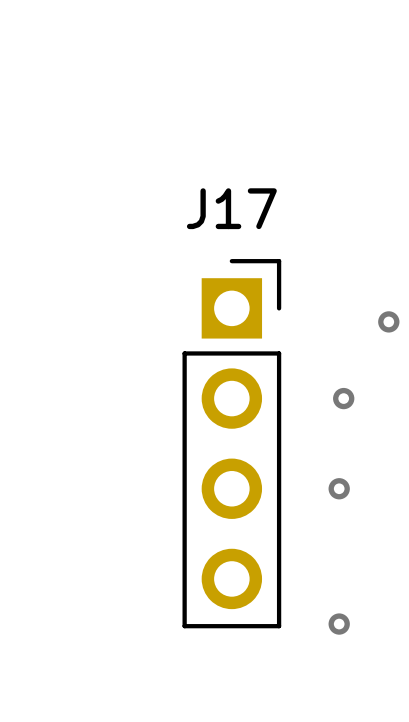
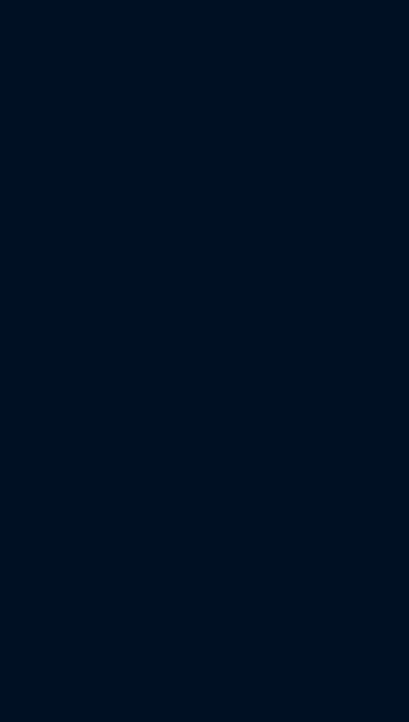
via: (388, 321) -> none
via: (343, 398) -> none
J17: (231, 443) -> none
via: (339, 488) -> none
via: (339, 624) -> none

